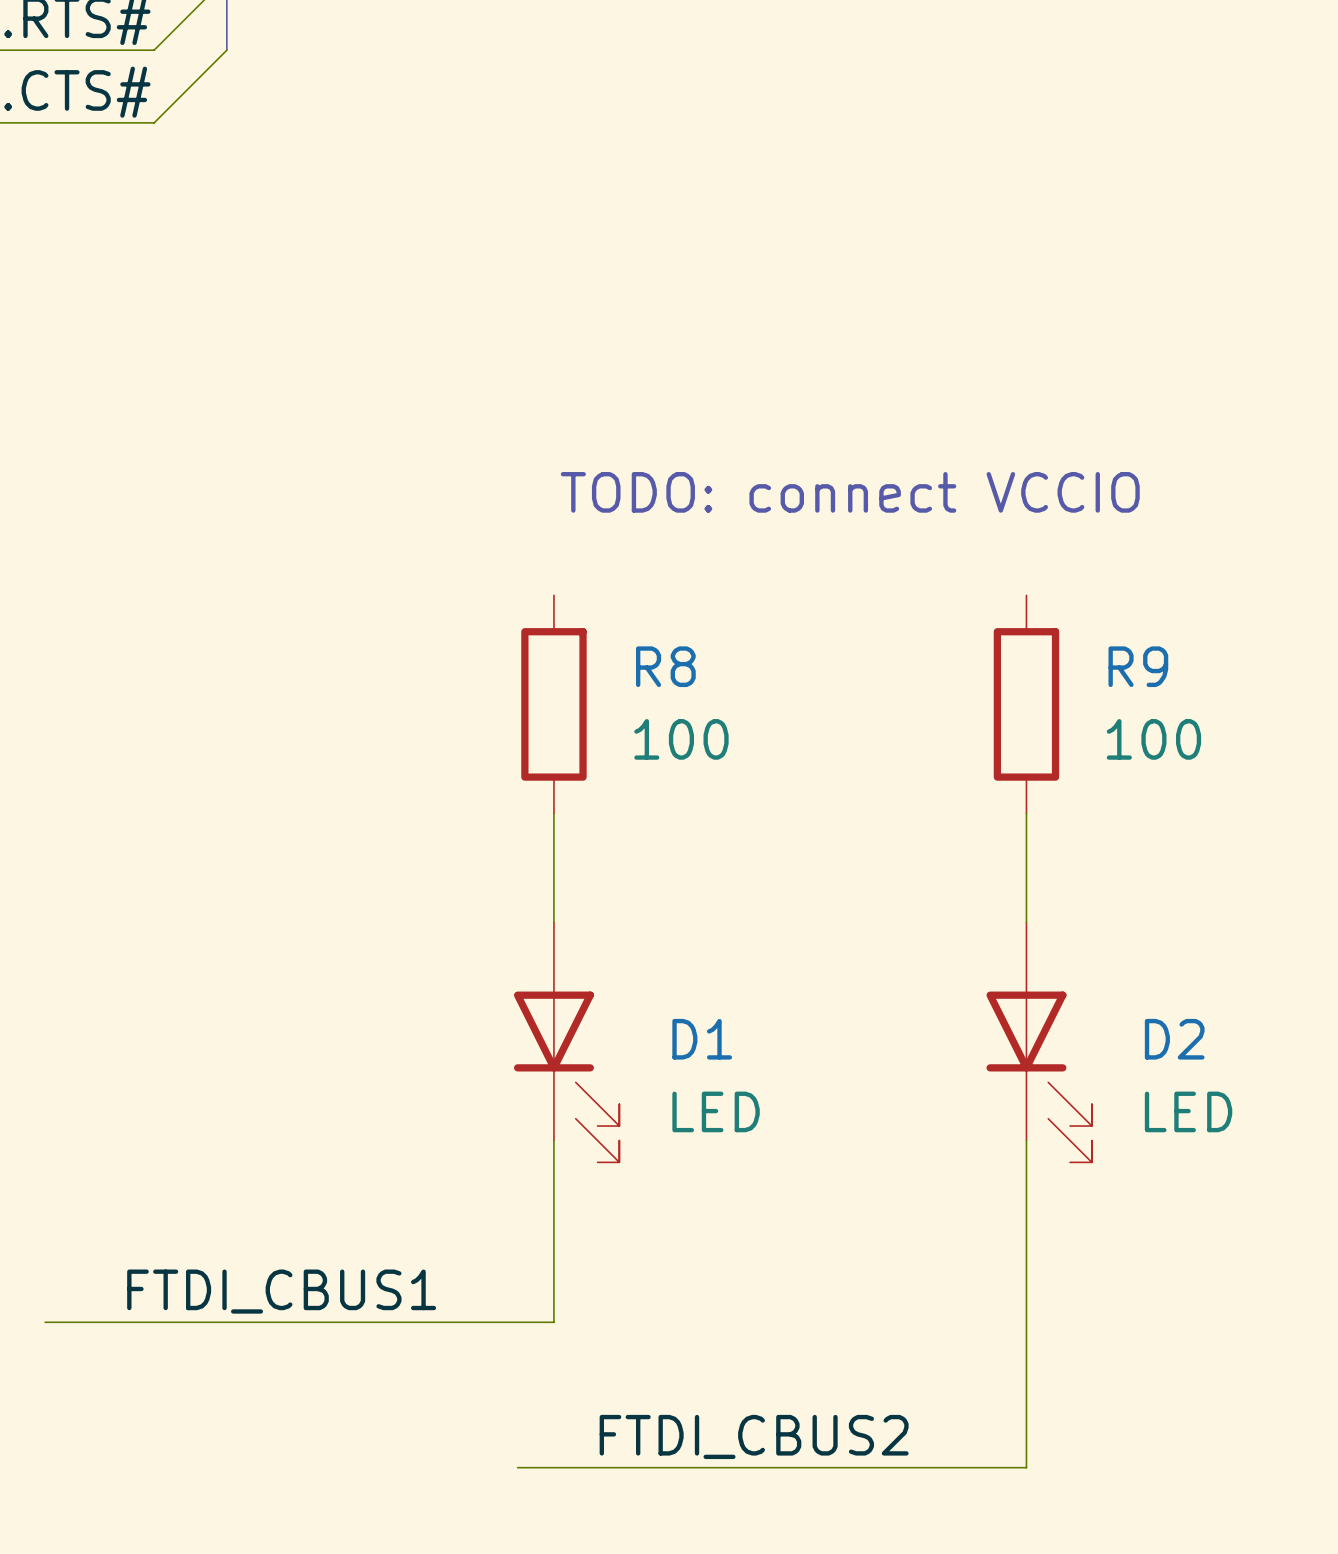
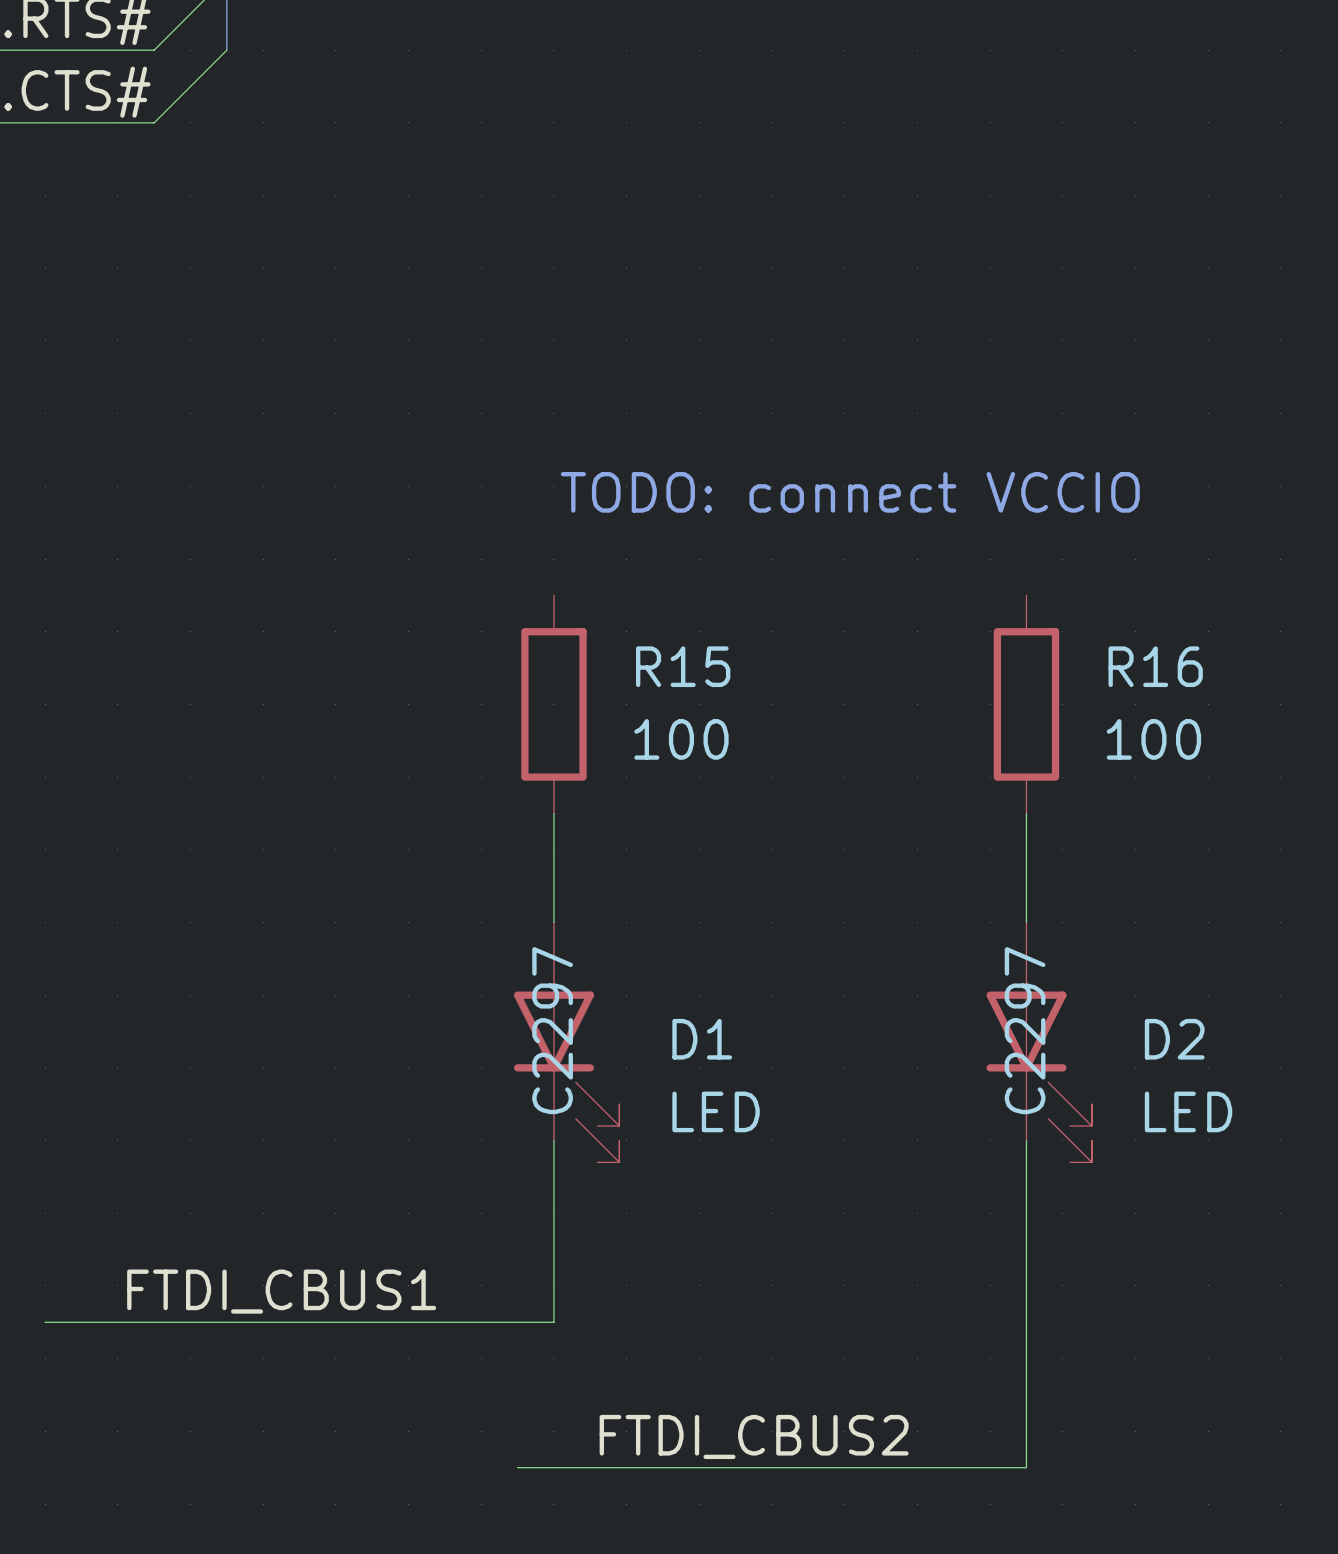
R8 name: R8 (665, 666) -> R15 (683, 666)
R9 name: R9 (1138, 666) -> R16 (1155, 666)
D1 text: none -> C2297 (552, 1030)
D2 text: none -> C2297 (1025, 1030)

